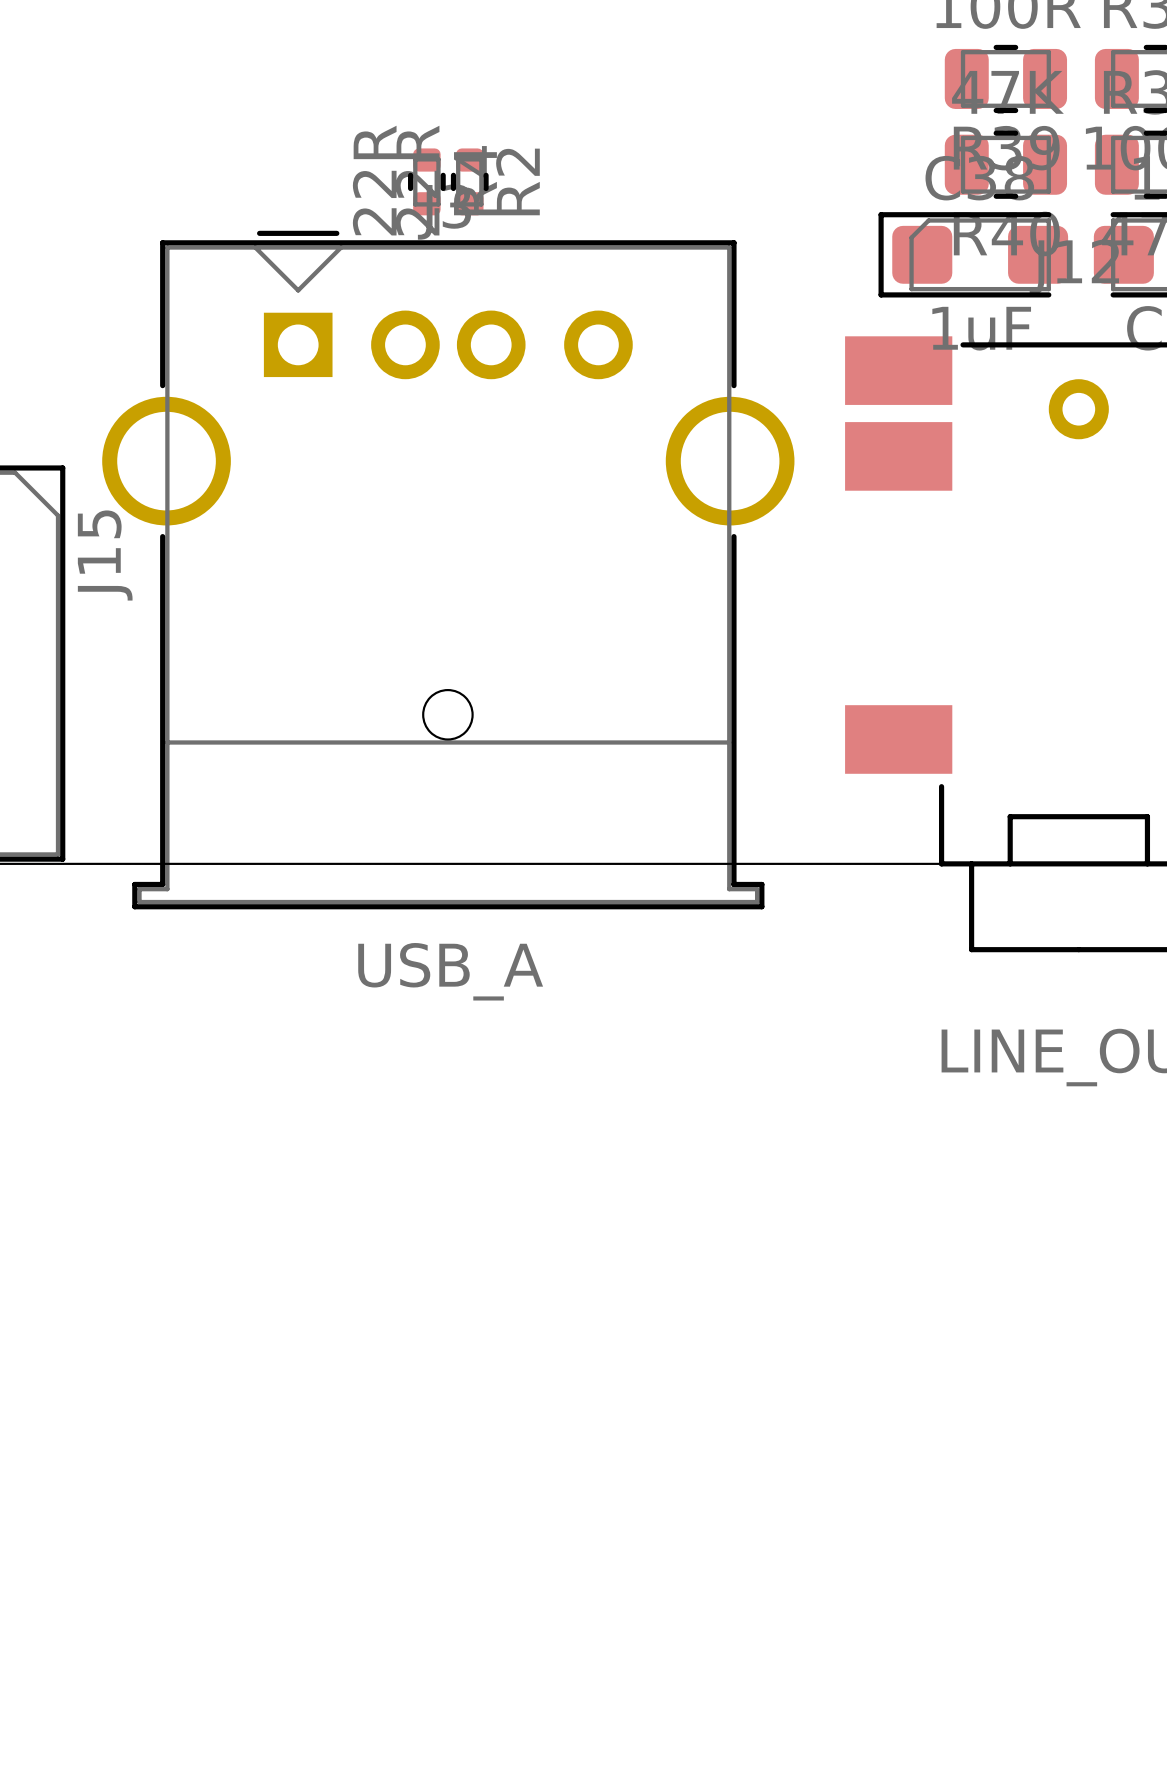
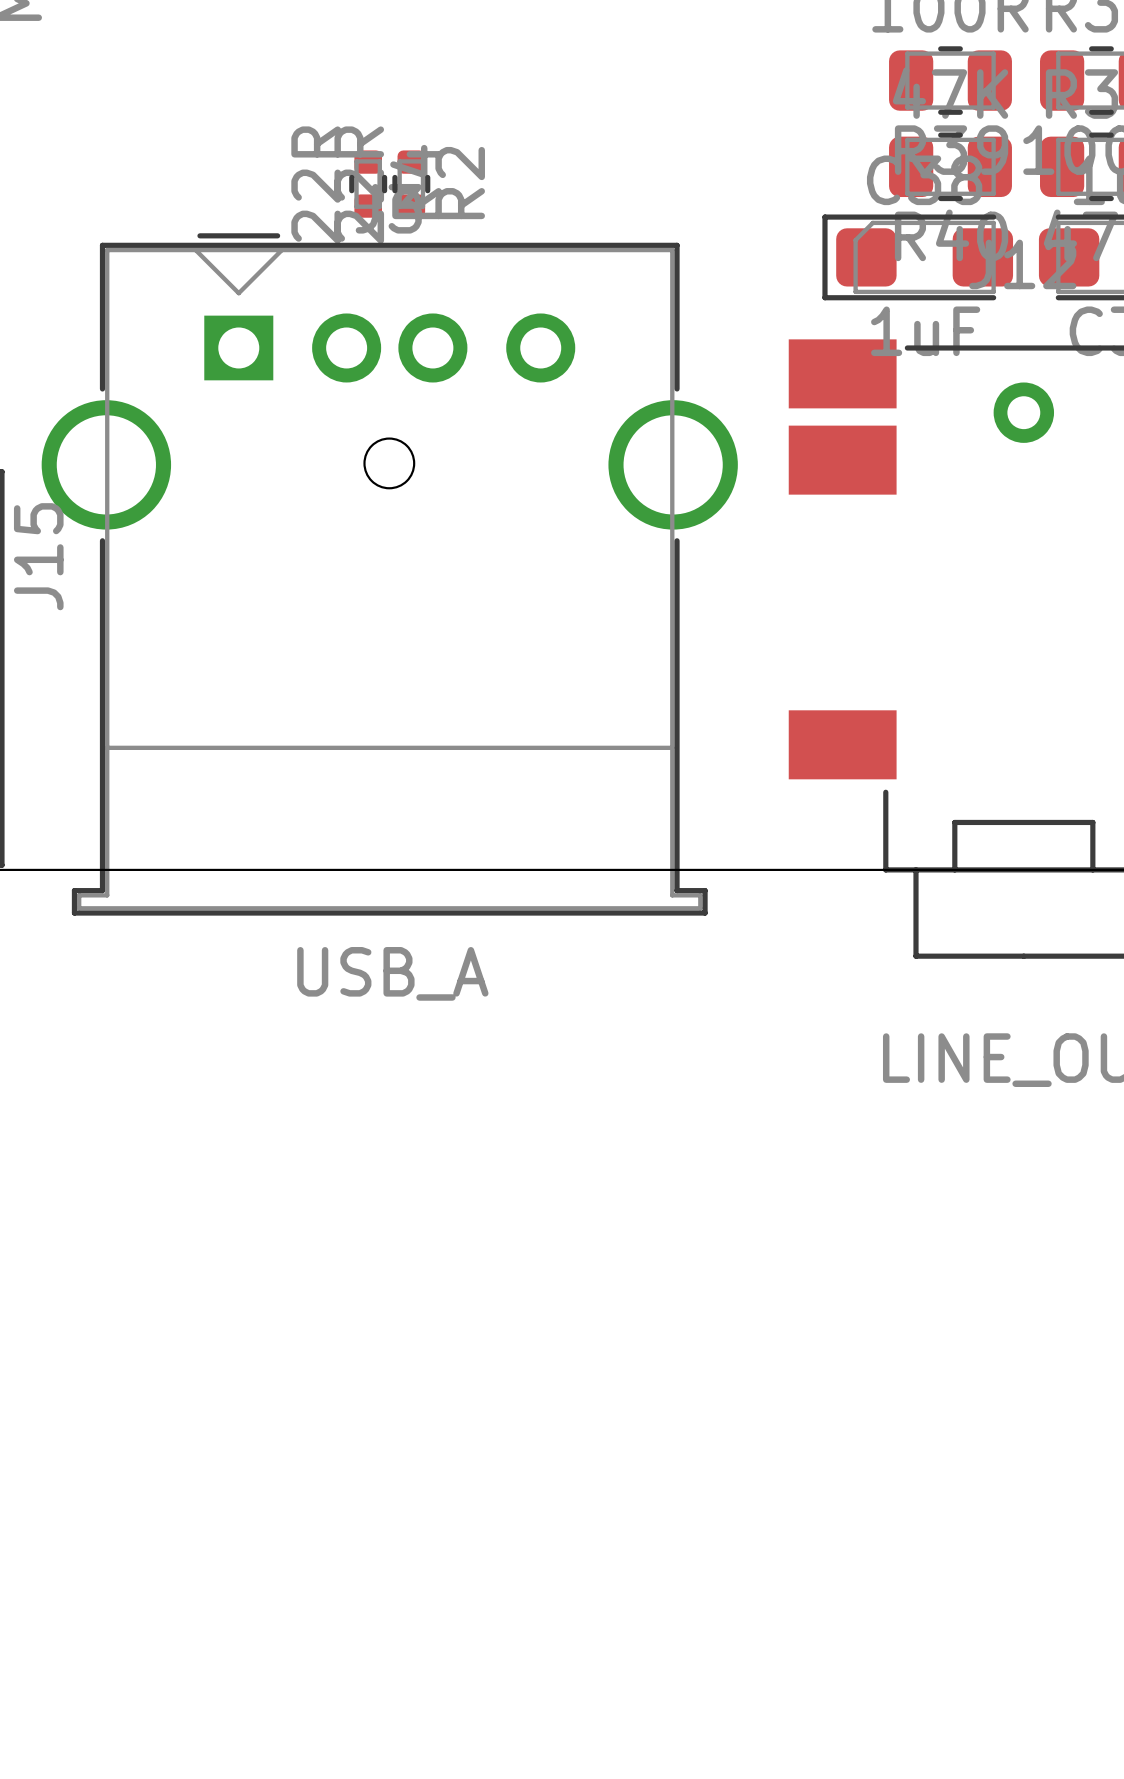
round board edge position: (447, 714) -> (389, 463)

